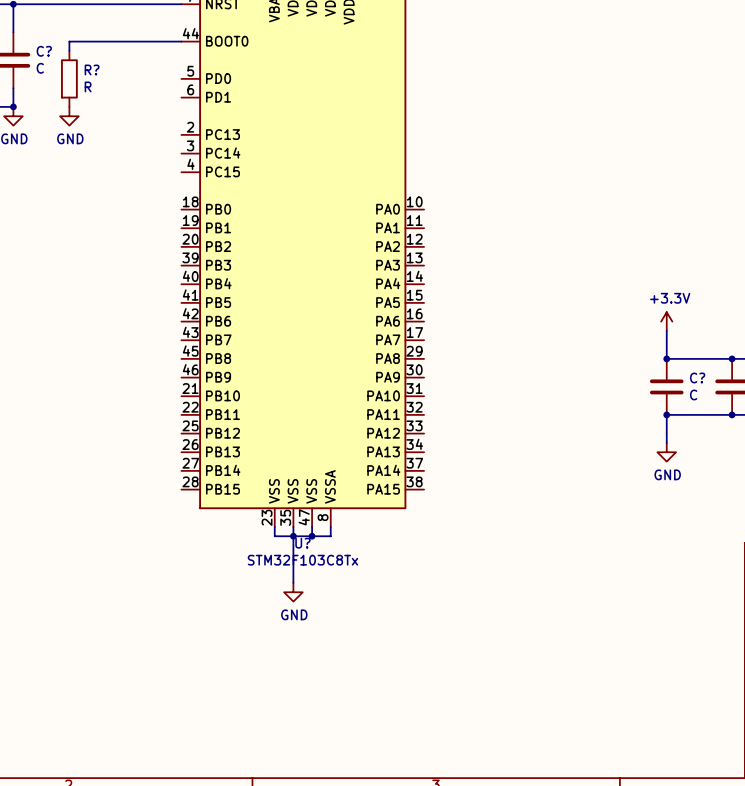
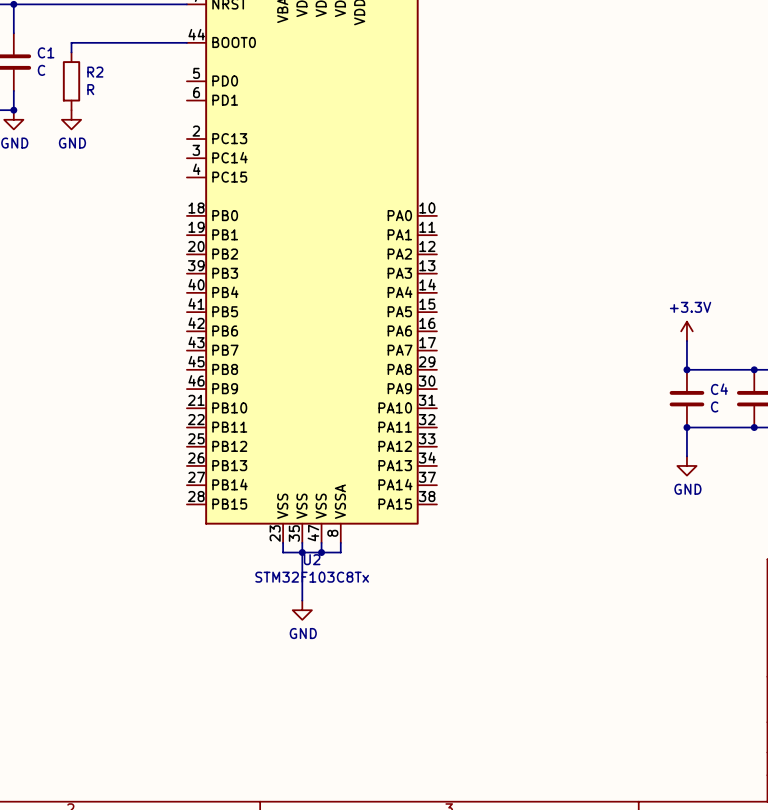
C? name: C? (44, 51) -> C1 (46, 52)
R? name: R? (92, 69) -> R2 (95, 72)
C? name: C? (697, 377) -> C4 (719, 389)
U? name: U? (302, 543) -> U2 (312, 559)

